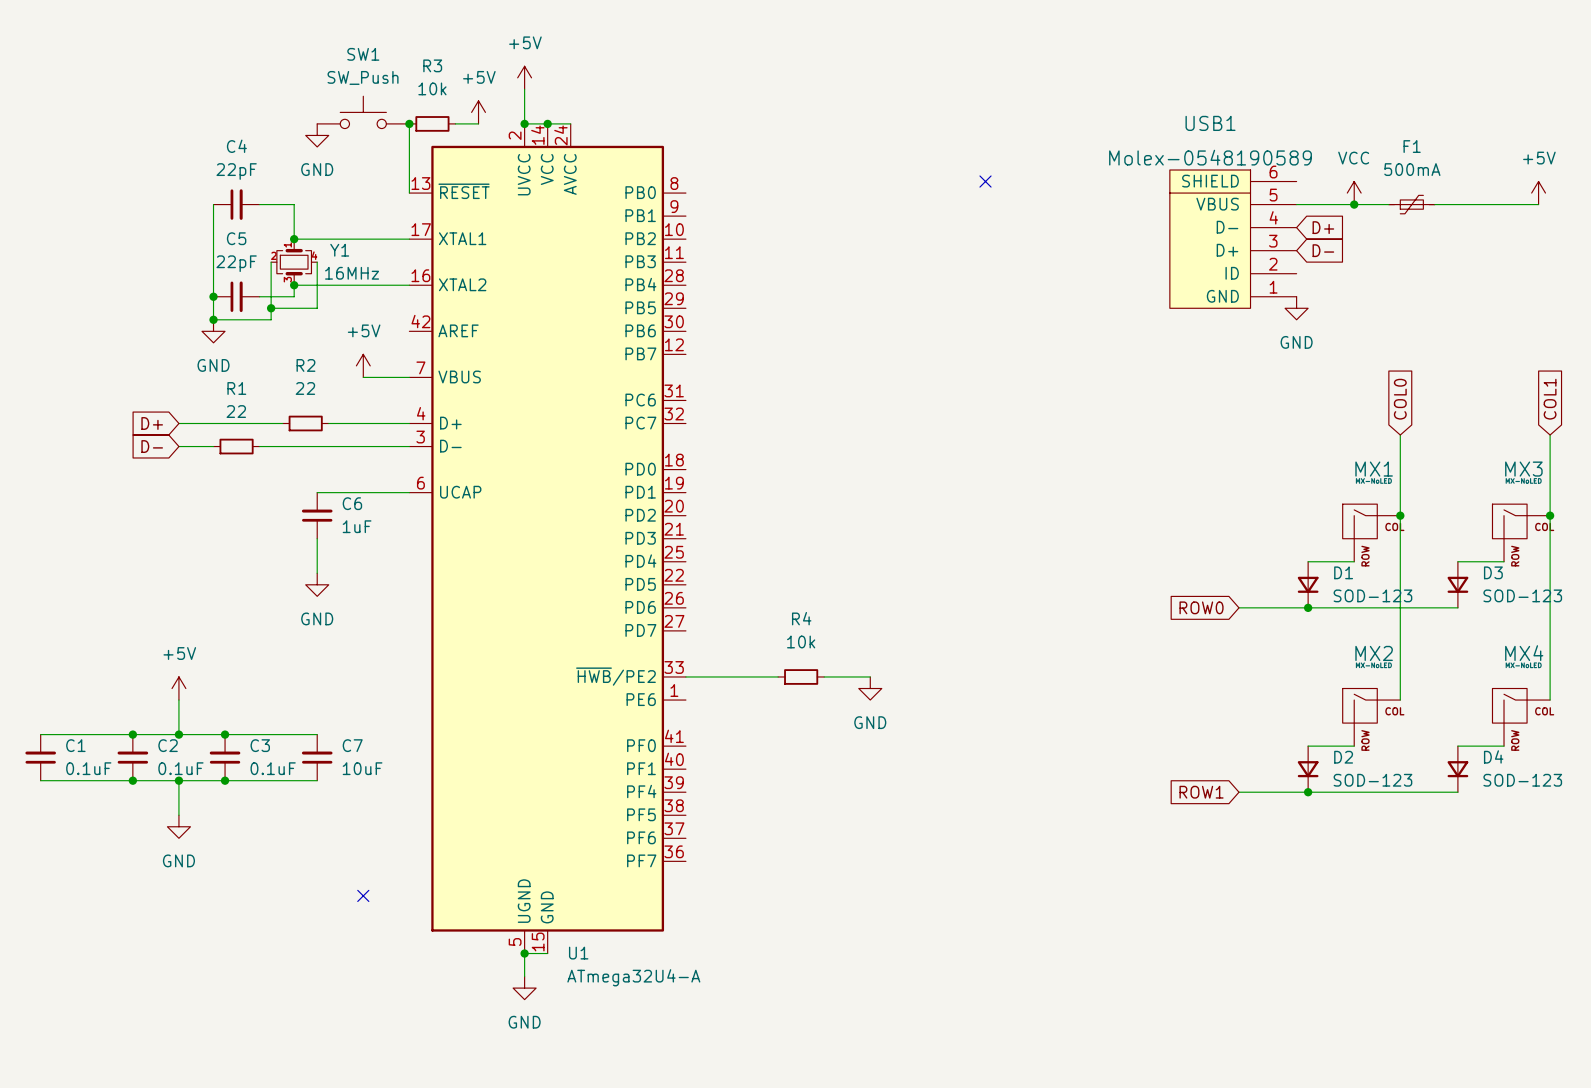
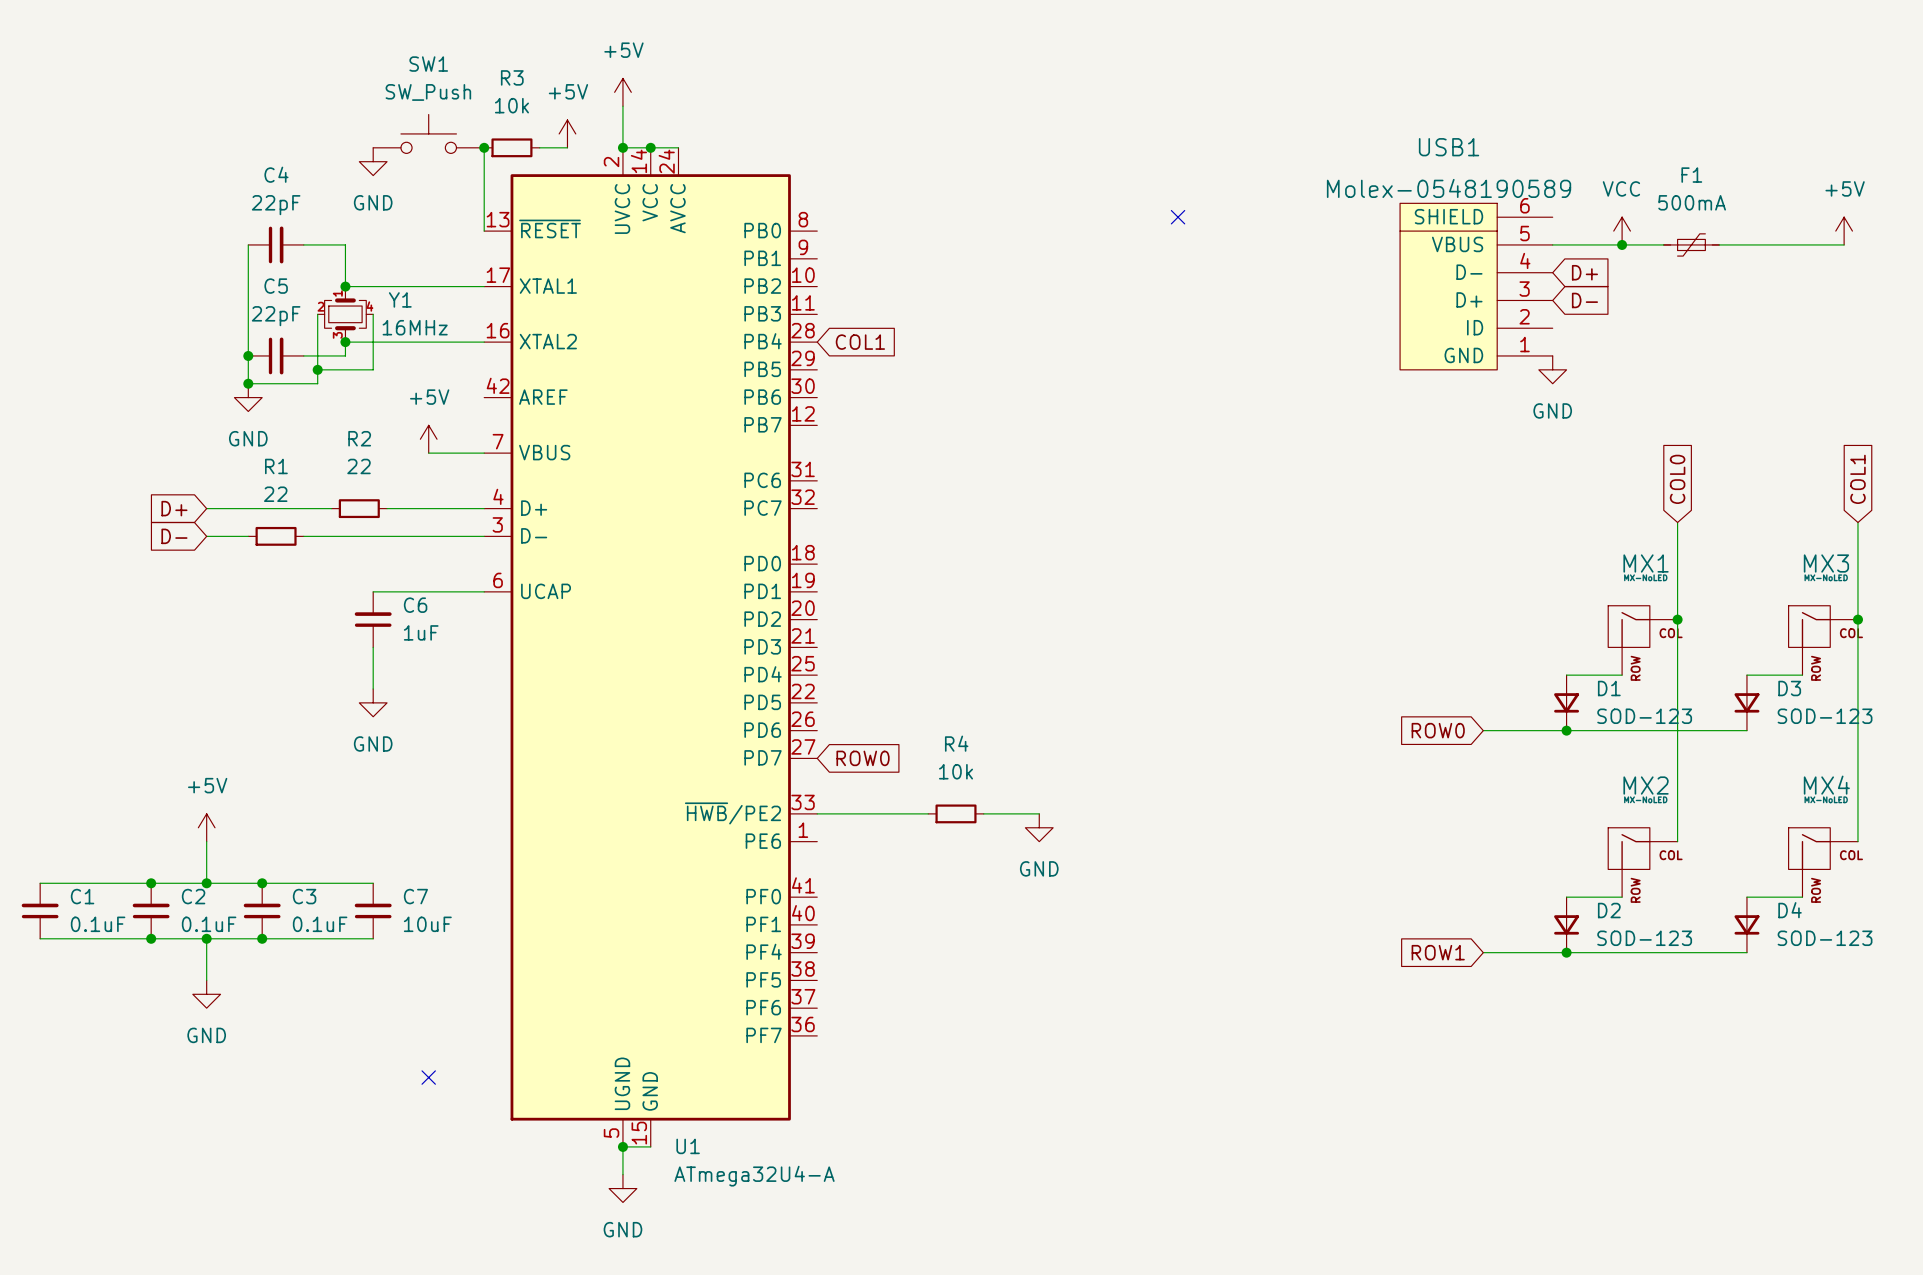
global label: none -> COL1 (860, 342)
global label: none -> ROW0 (863, 758)

